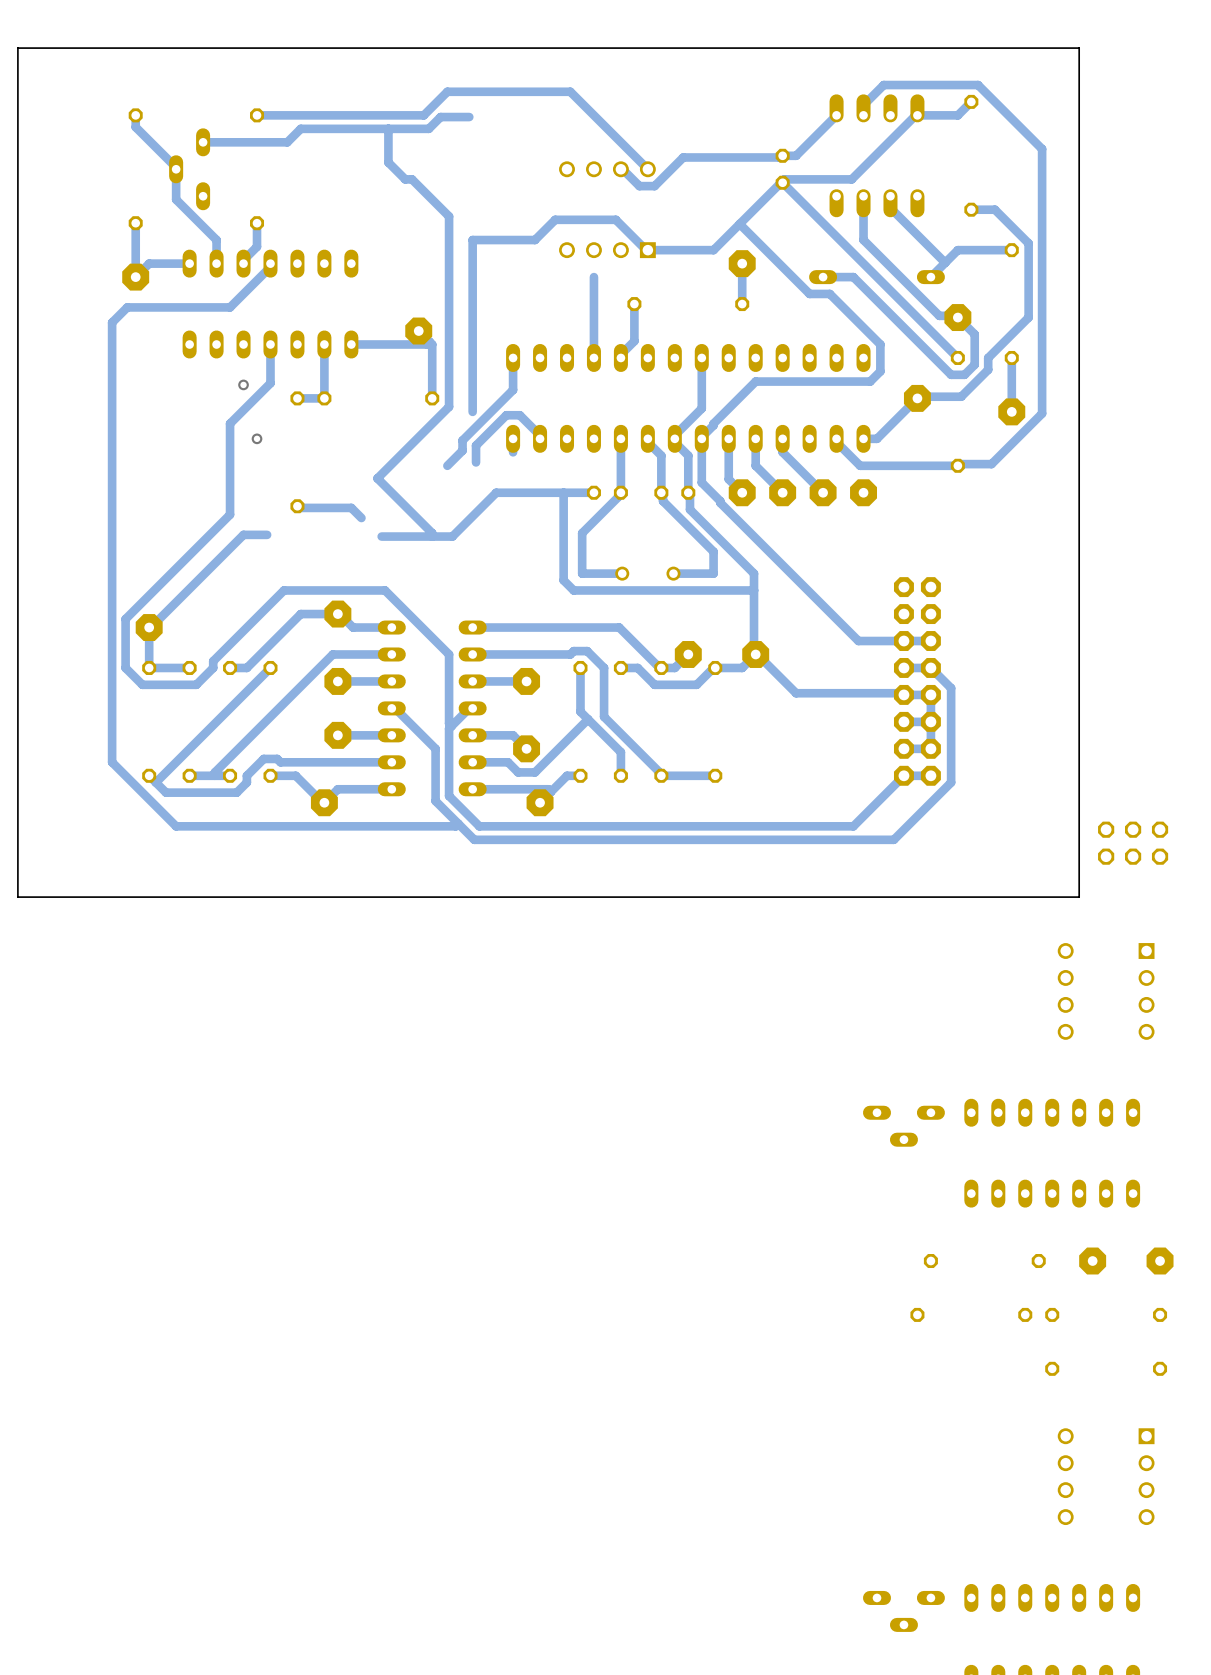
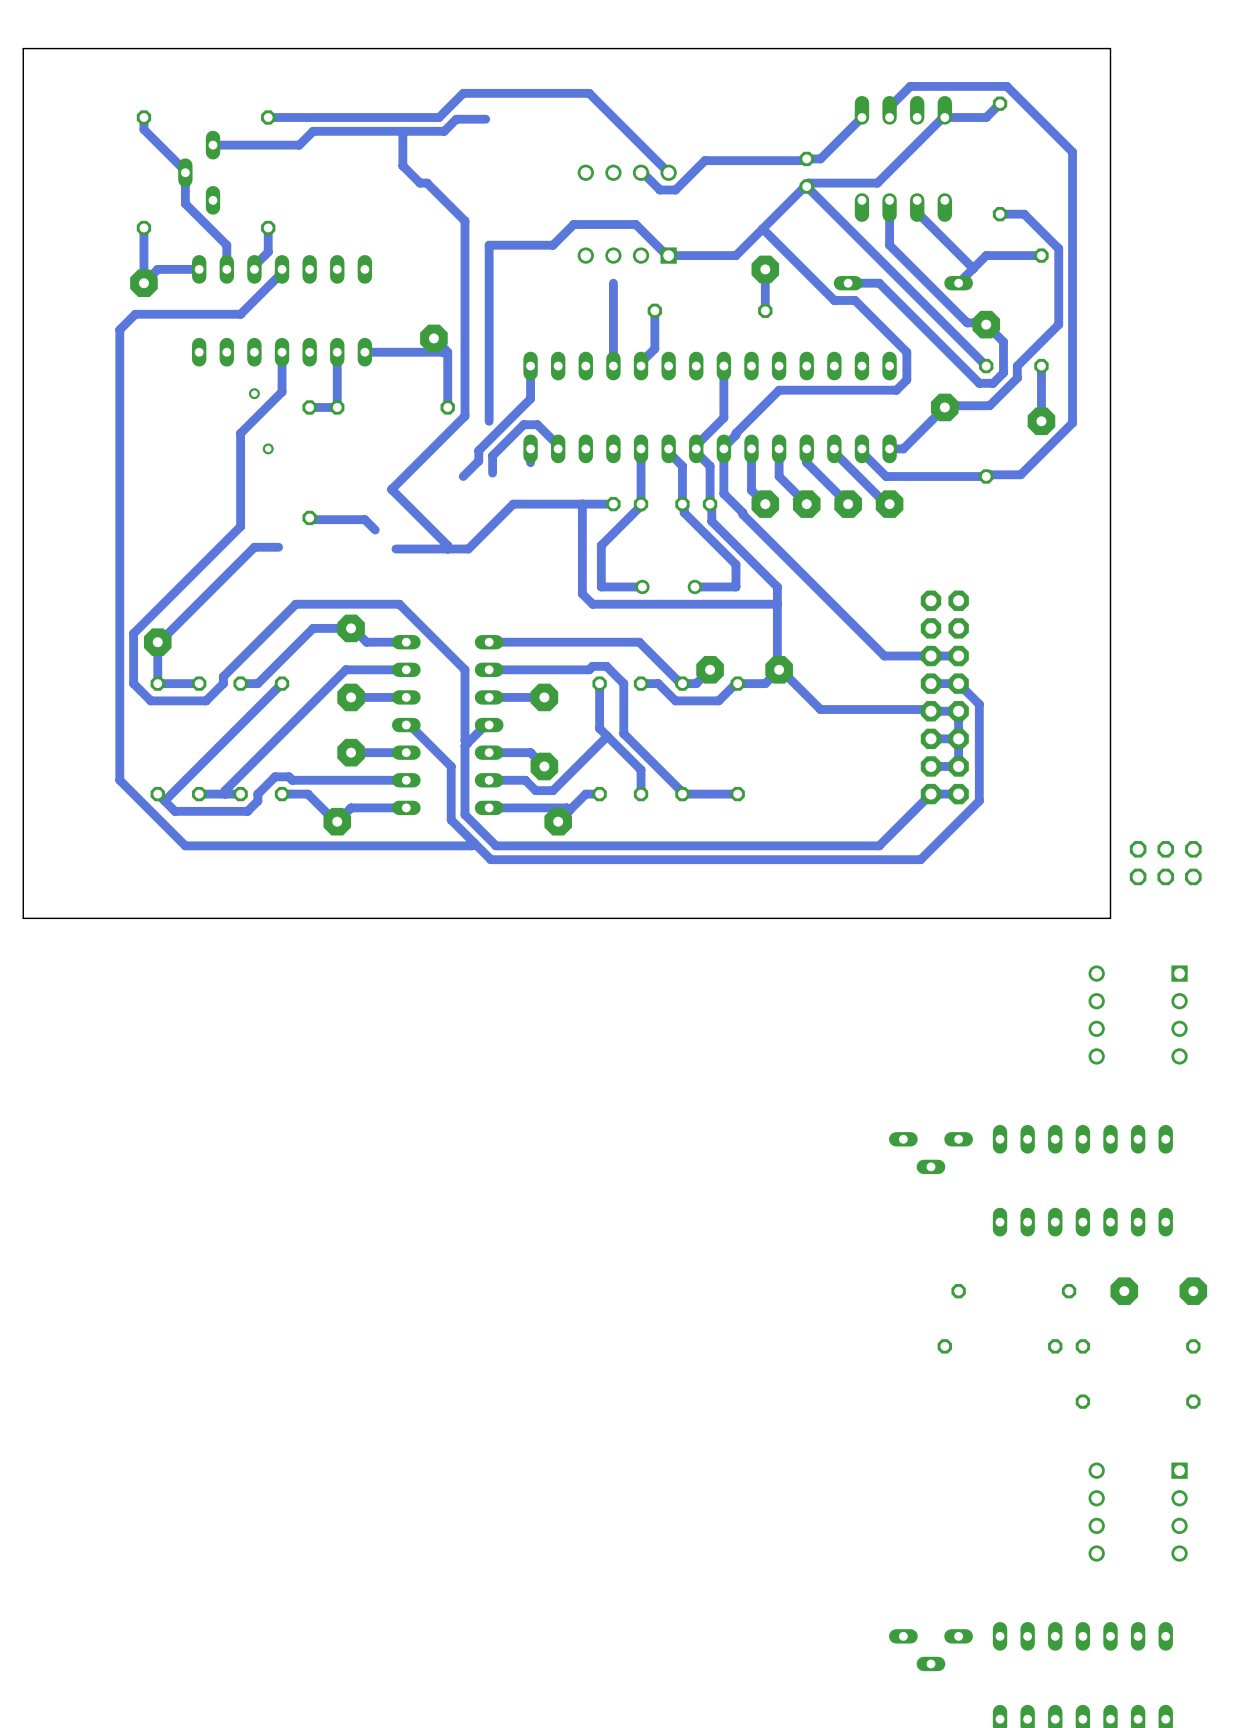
bottom track: none -> (834, 448) (834, 452) (886, 504) (889, 504)

